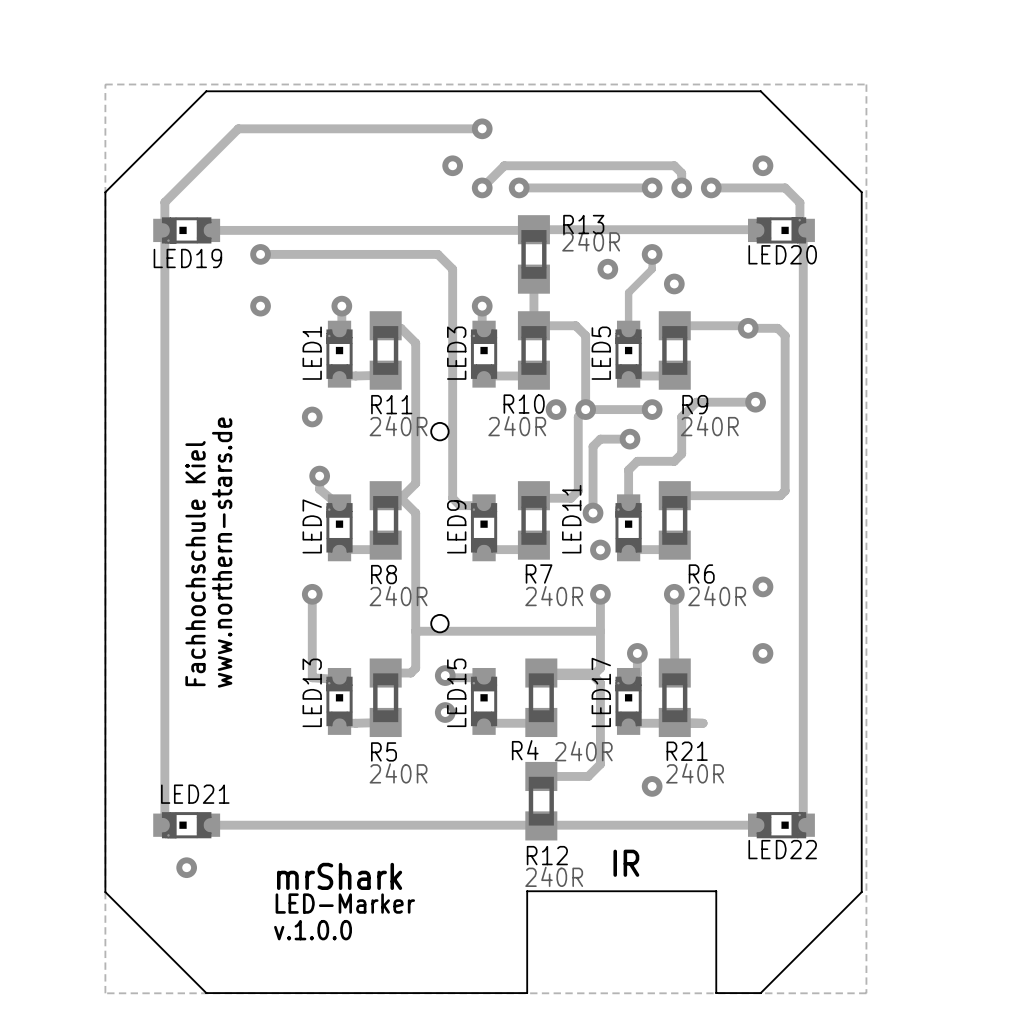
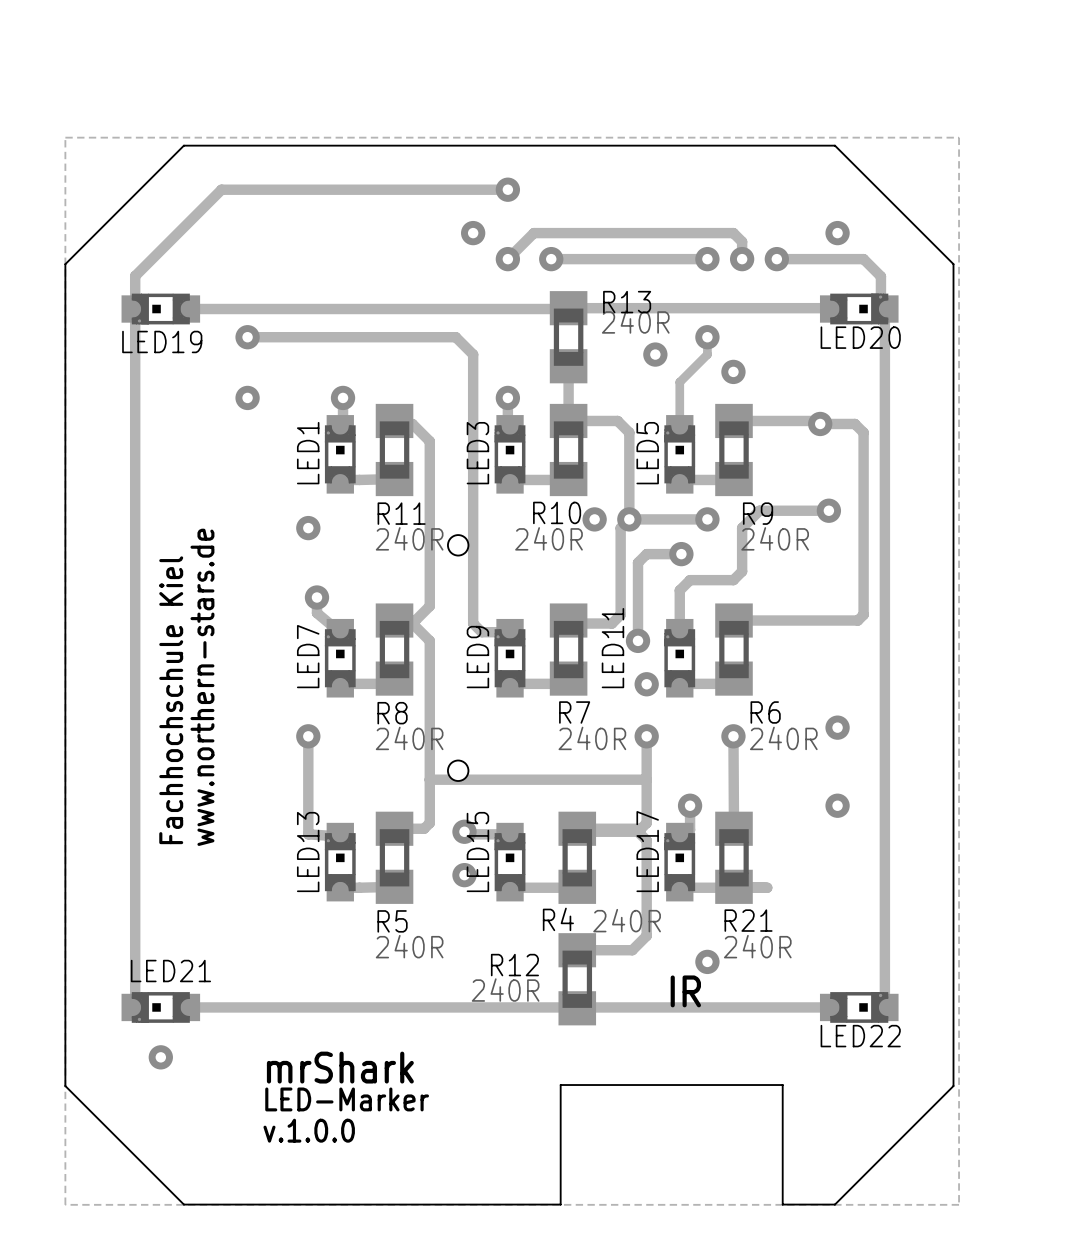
R12 name position: R12 (547, 855) -> R12 (514, 965)
text position: IR (626, 863) -> IR (685, 991)
R12 value position: 240R (554, 876) -> 240R (505, 990)

